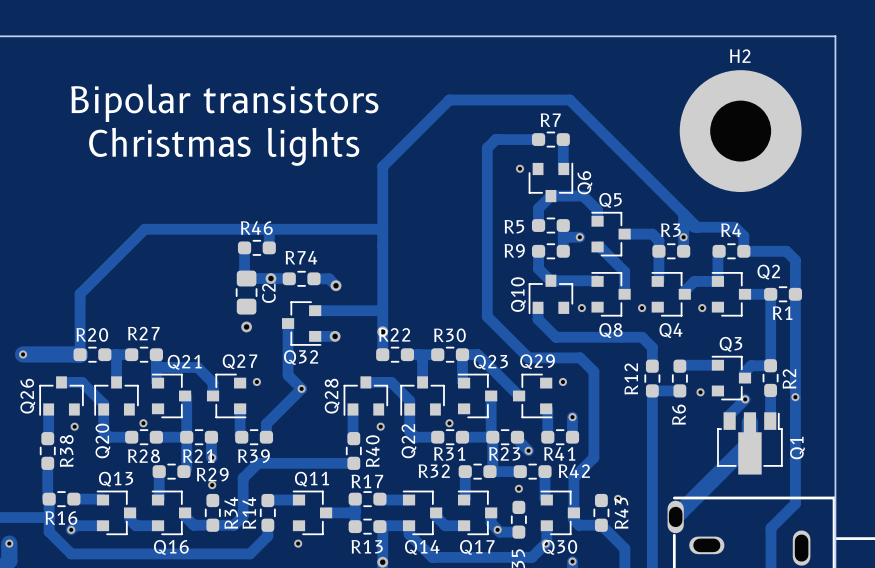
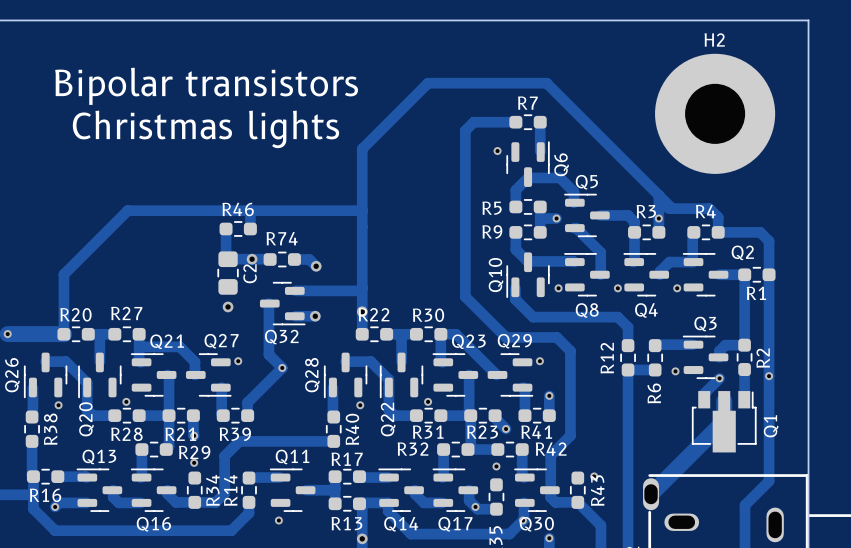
Q6 footprint: [528, 162, 574, 203] -> [506, 141, 550, 187]
Q5 footprint: [591, 211, 631, 257] -> [564, 193, 610, 238]
Q8 footprint: [591, 272, 631, 317] -> [564, 253, 610, 297]
Q4 footprint: [651, 272, 691, 317] -> [623, 253, 670, 297]
Q2 footprint: [711, 272, 752, 317] -> [682, 253, 729, 297]
Q10 footprint: [528, 274, 574, 315] -> [506, 252, 550, 298]
Q32 footprint: [281, 301, 322, 346] -> [259, 281, 306, 326]
Q3 footprint: [711, 355, 752, 401] -> [682, 335, 729, 379]
Q21 footprint: [151, 373, 192, 419] -> [130, 353, 177, 397]
Q27 footprint: [206, 373, 247, 419] -> [185, 353, 232, 397]
Q23 footprint: [457, 373, 498, 419] -> [432, 353, 479, 397]
Q29 footprint: [513, 373, 553, 419] -> [487, 353, 534, 397]
Q26 footprint: [39, 376, 84, 416] -> [23, 352, 68, 399]
Q20 footprint: [94, 376, 139, 416] -> [78, 352, 122, 399]
Q28 footprint: [343, 376, 389, 416] -> [324, 352, 368, 399]
Q22 footprint: [400, 376, 445, 416] -> [379, 352, 424, 399]
Q13 footprint: [96, 490, 137, 536] -> [76, 468, 123, 512]
Q16 footprint: [151, 490, 192, 536] -> [130, 468, 177, 512]
Q11 footprint: [292, 490, 333, 536] -> [269, 468, 316, 512]
Q14 footprint: [402, 490, 443, 536] -> [378, 468, 424, 512]
Q17 footprint: [457, 490, 498, 536] -> [432, 468, 479, 512]
Q30 footprint: [540, 490, 580, 536] -> [514, 468, 560, 512]

